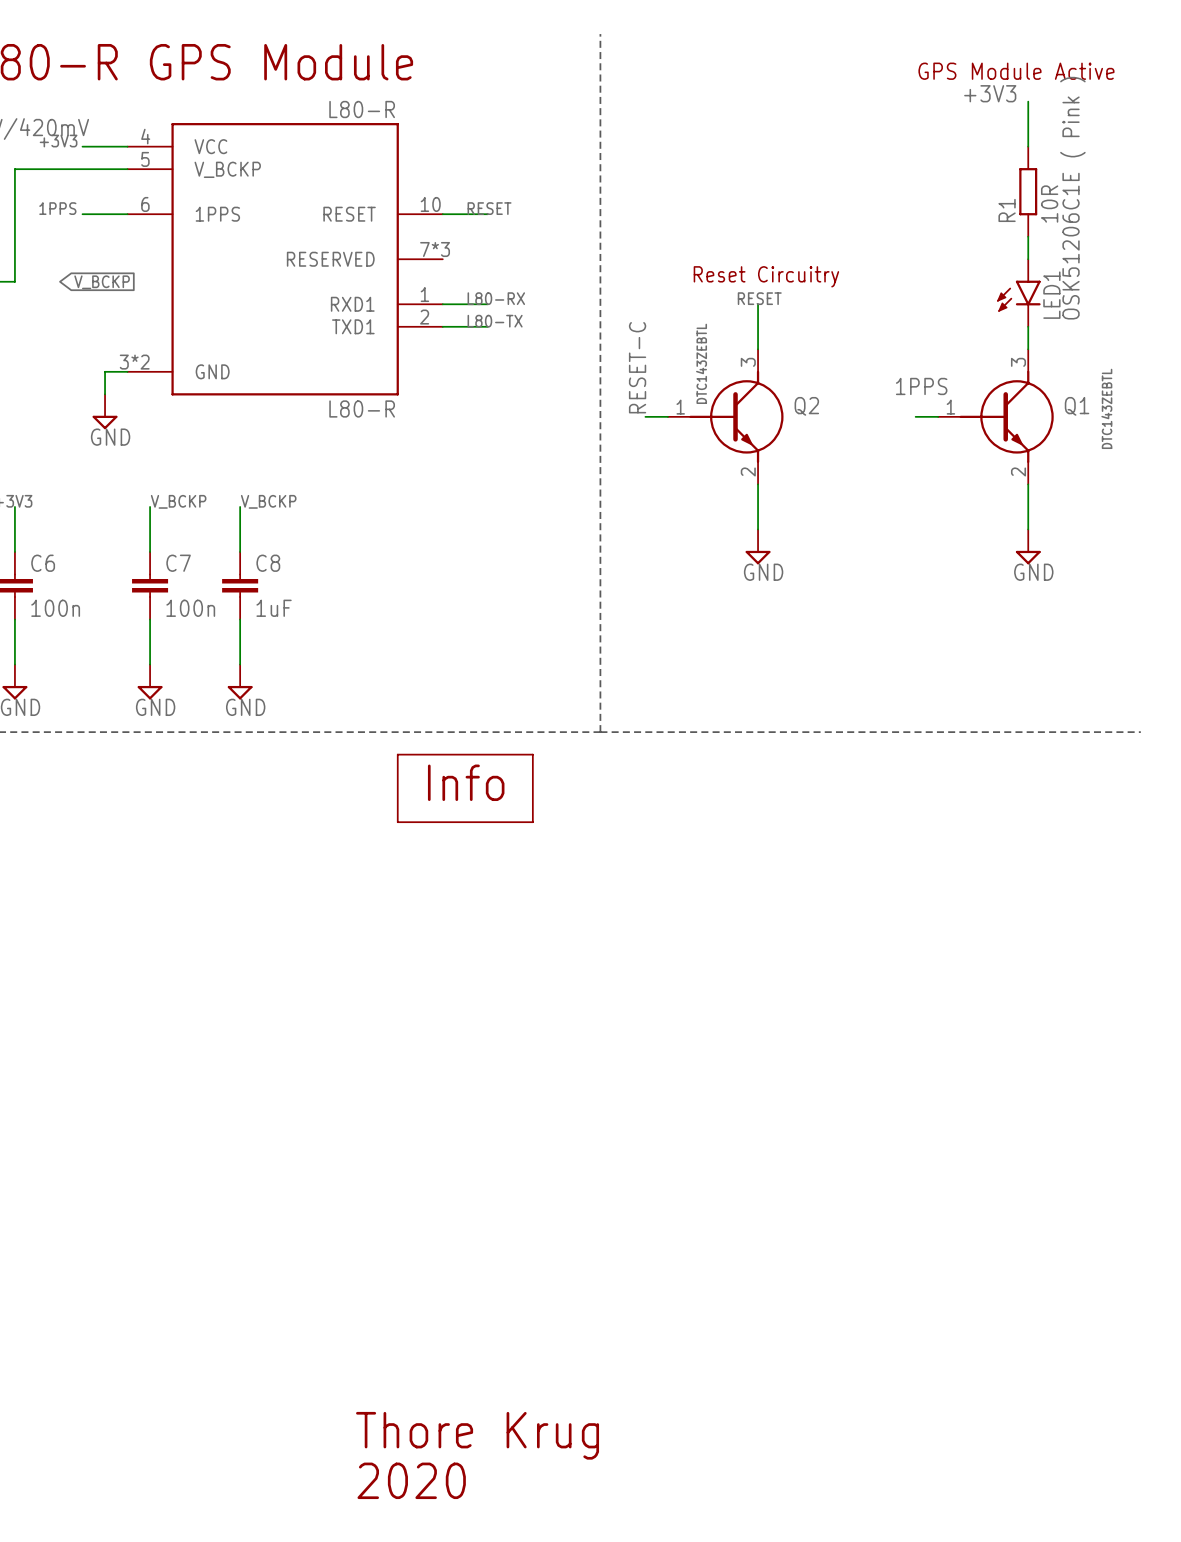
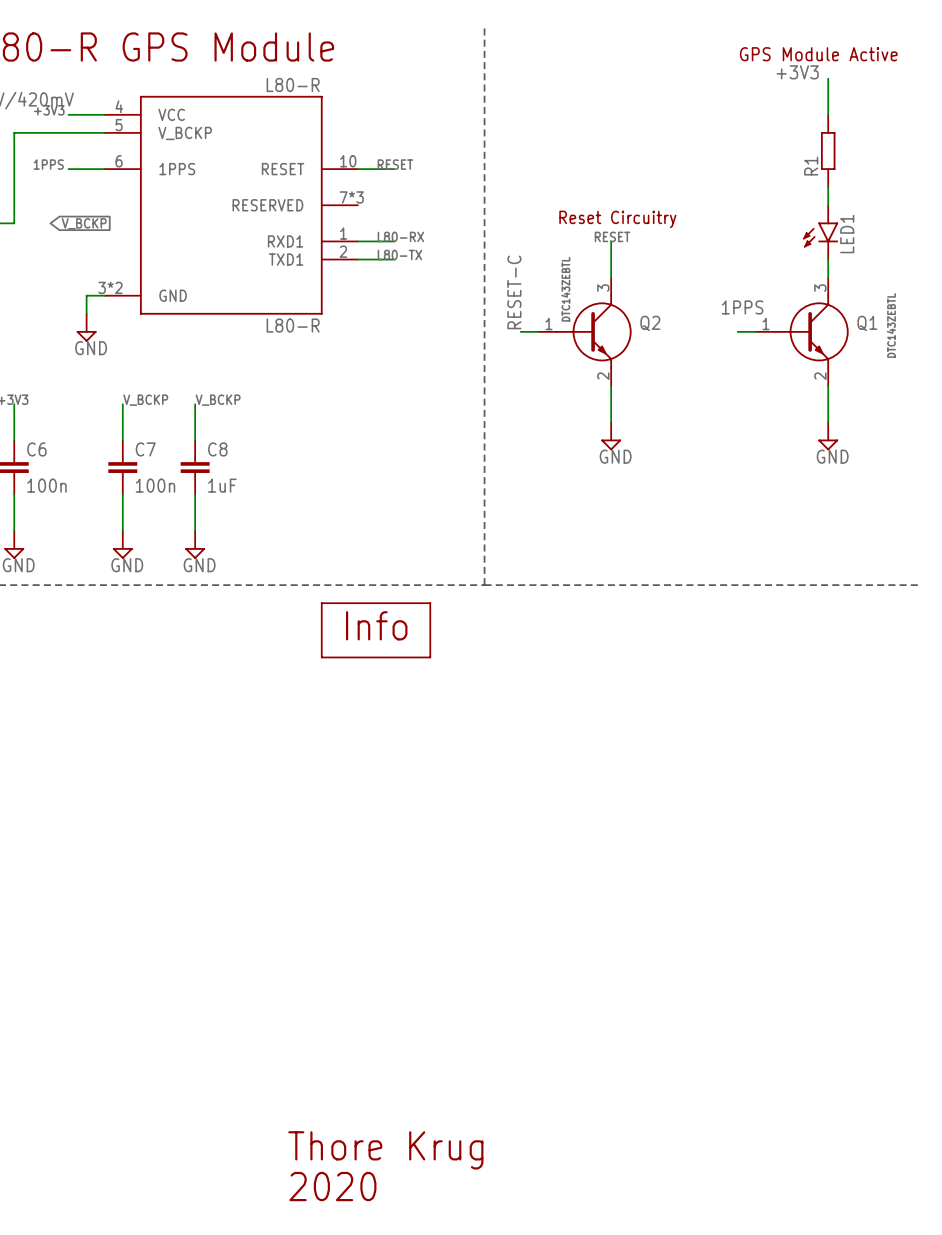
LED1 value: OSK51206C1E ( Pink ) (1072, 198) -> none
R1 value: 10R (1049, 204) -> none

